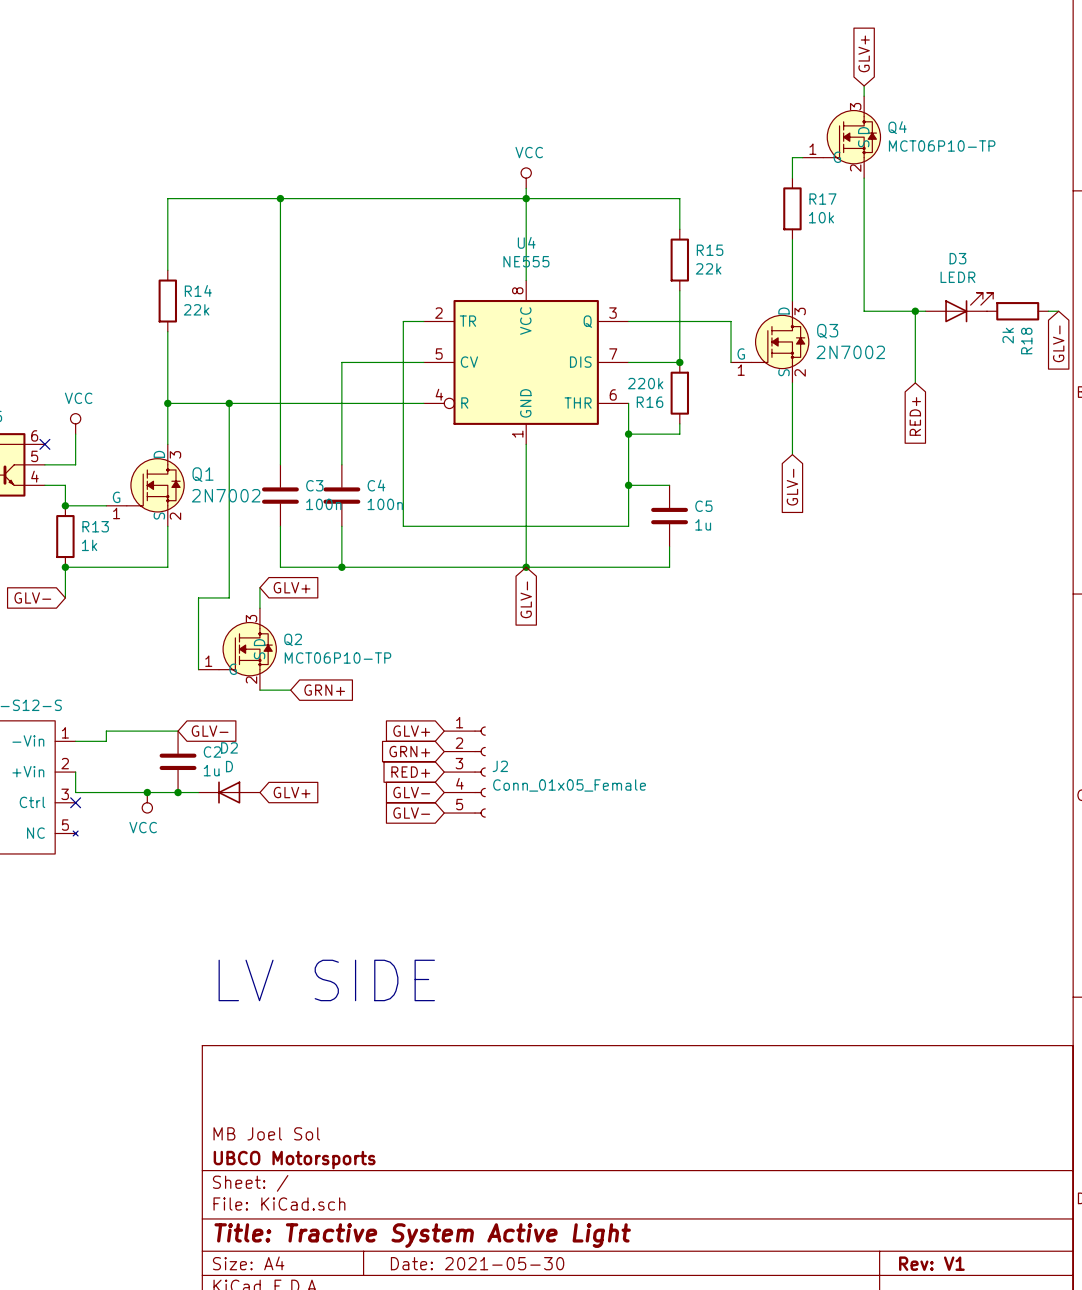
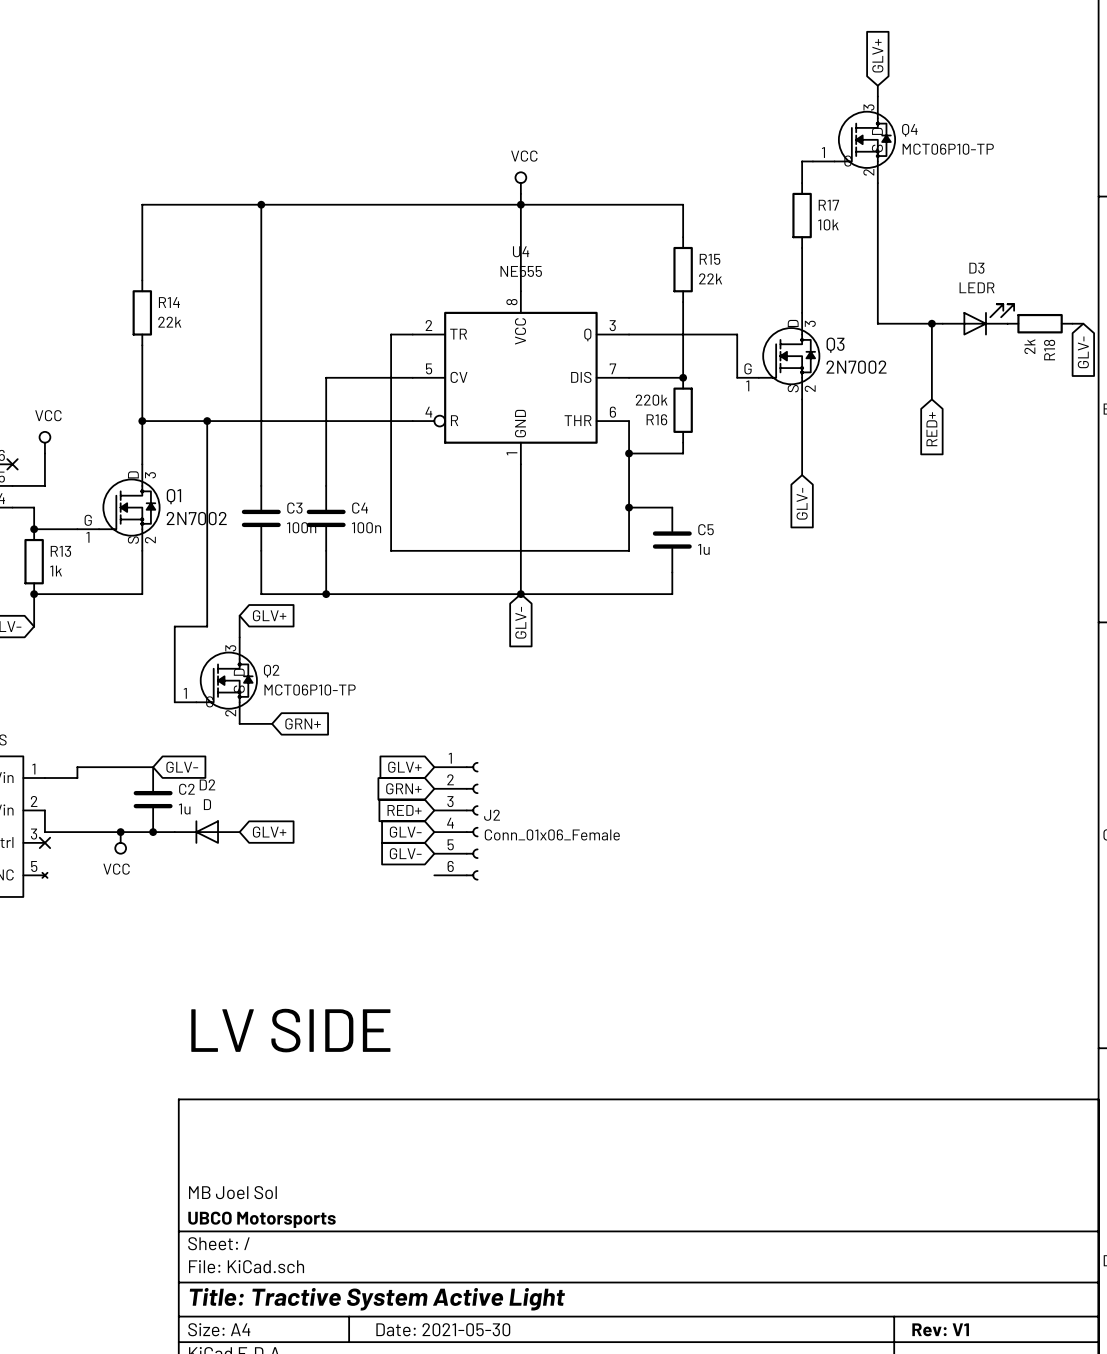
J2 symbol: [444, 726, 486, 818] -> [434, 762, 479, 881]
J2 value: Conn_01x05_Female (569, 785) -> Conn_01x06_Female (552, 834)

